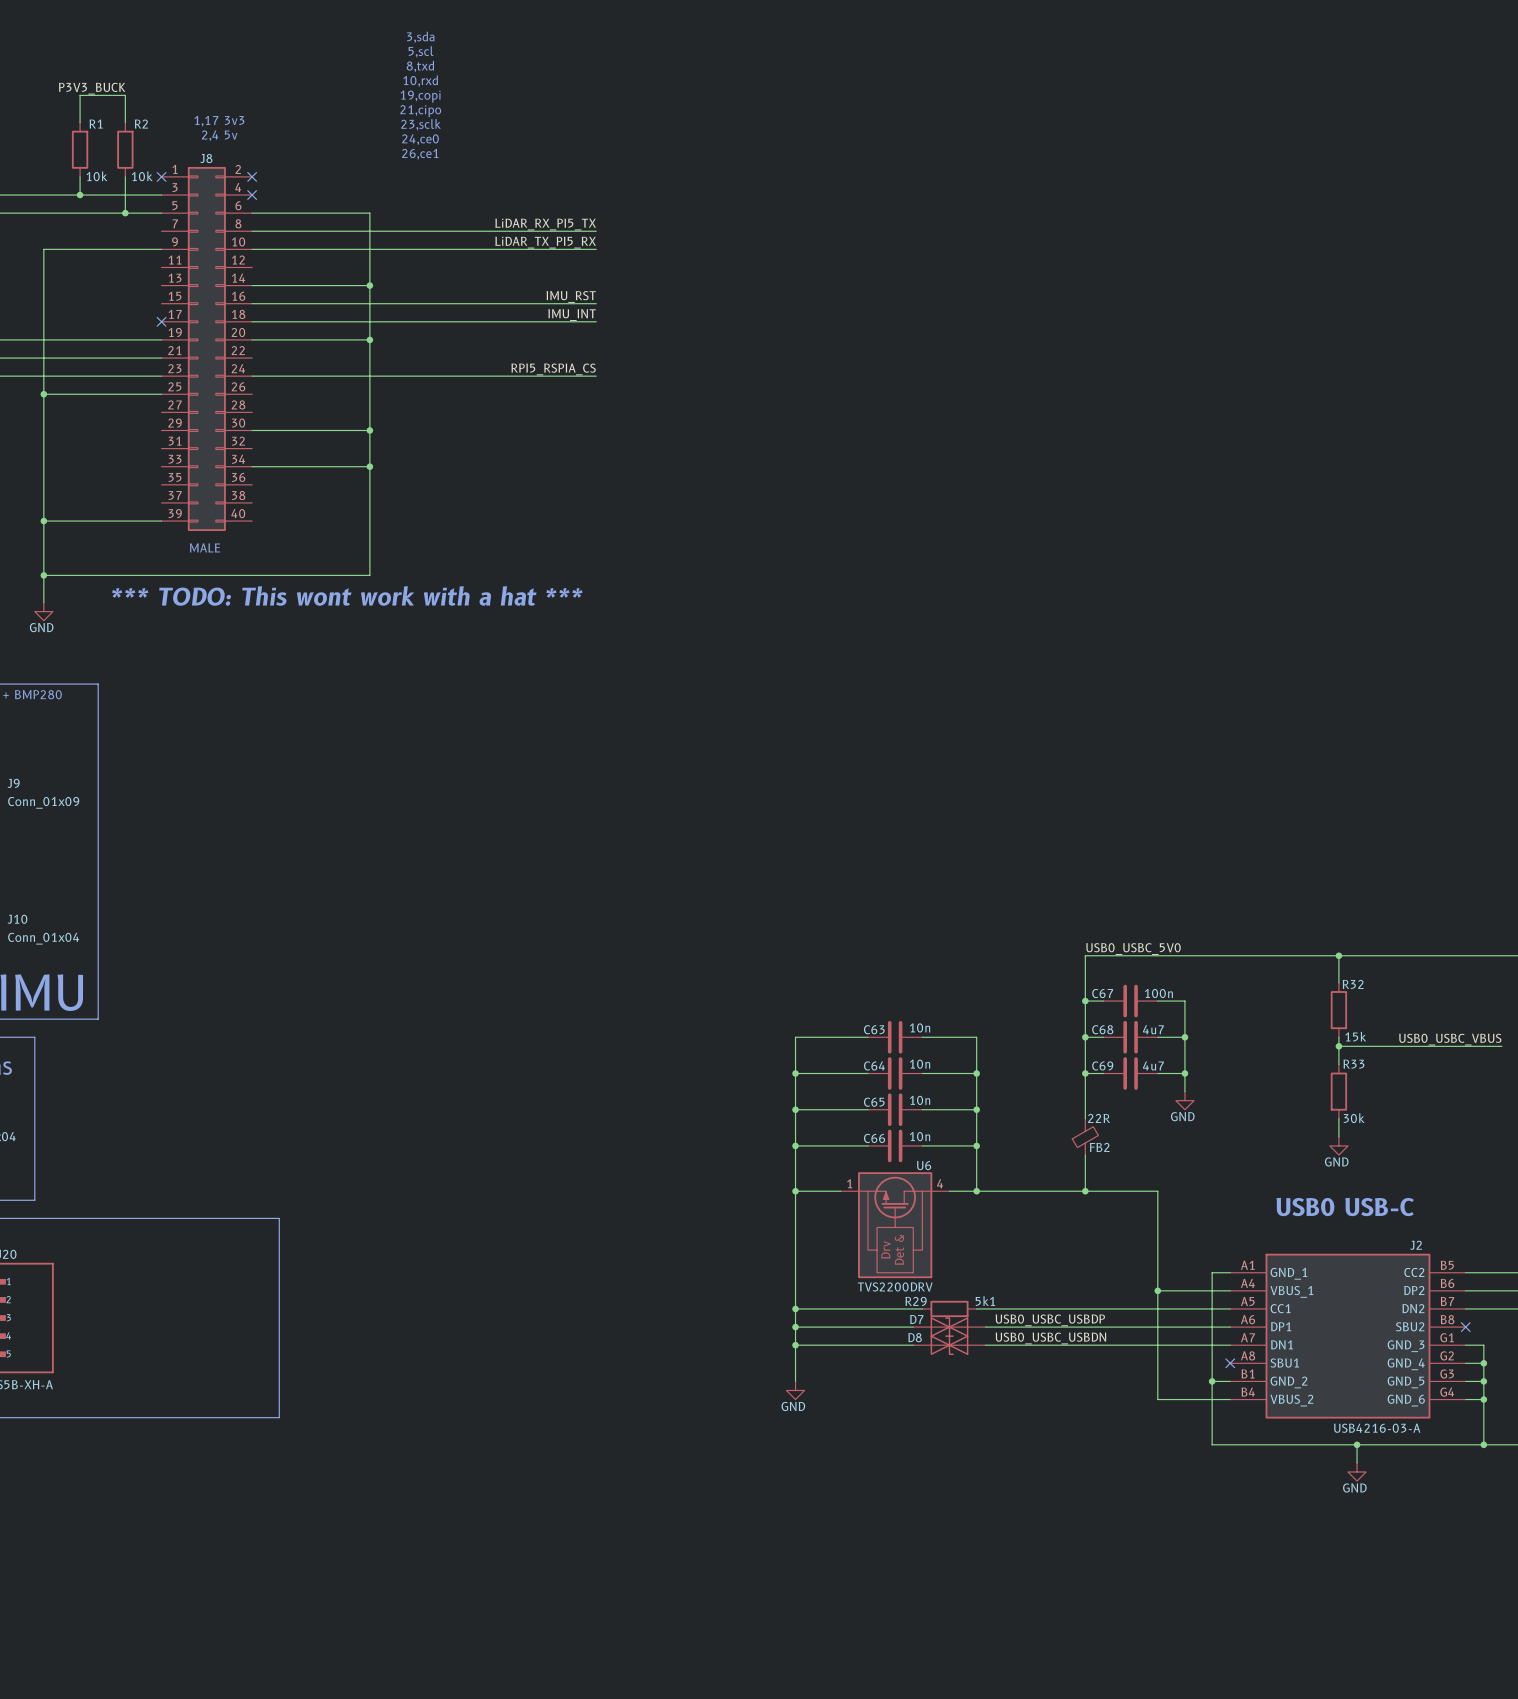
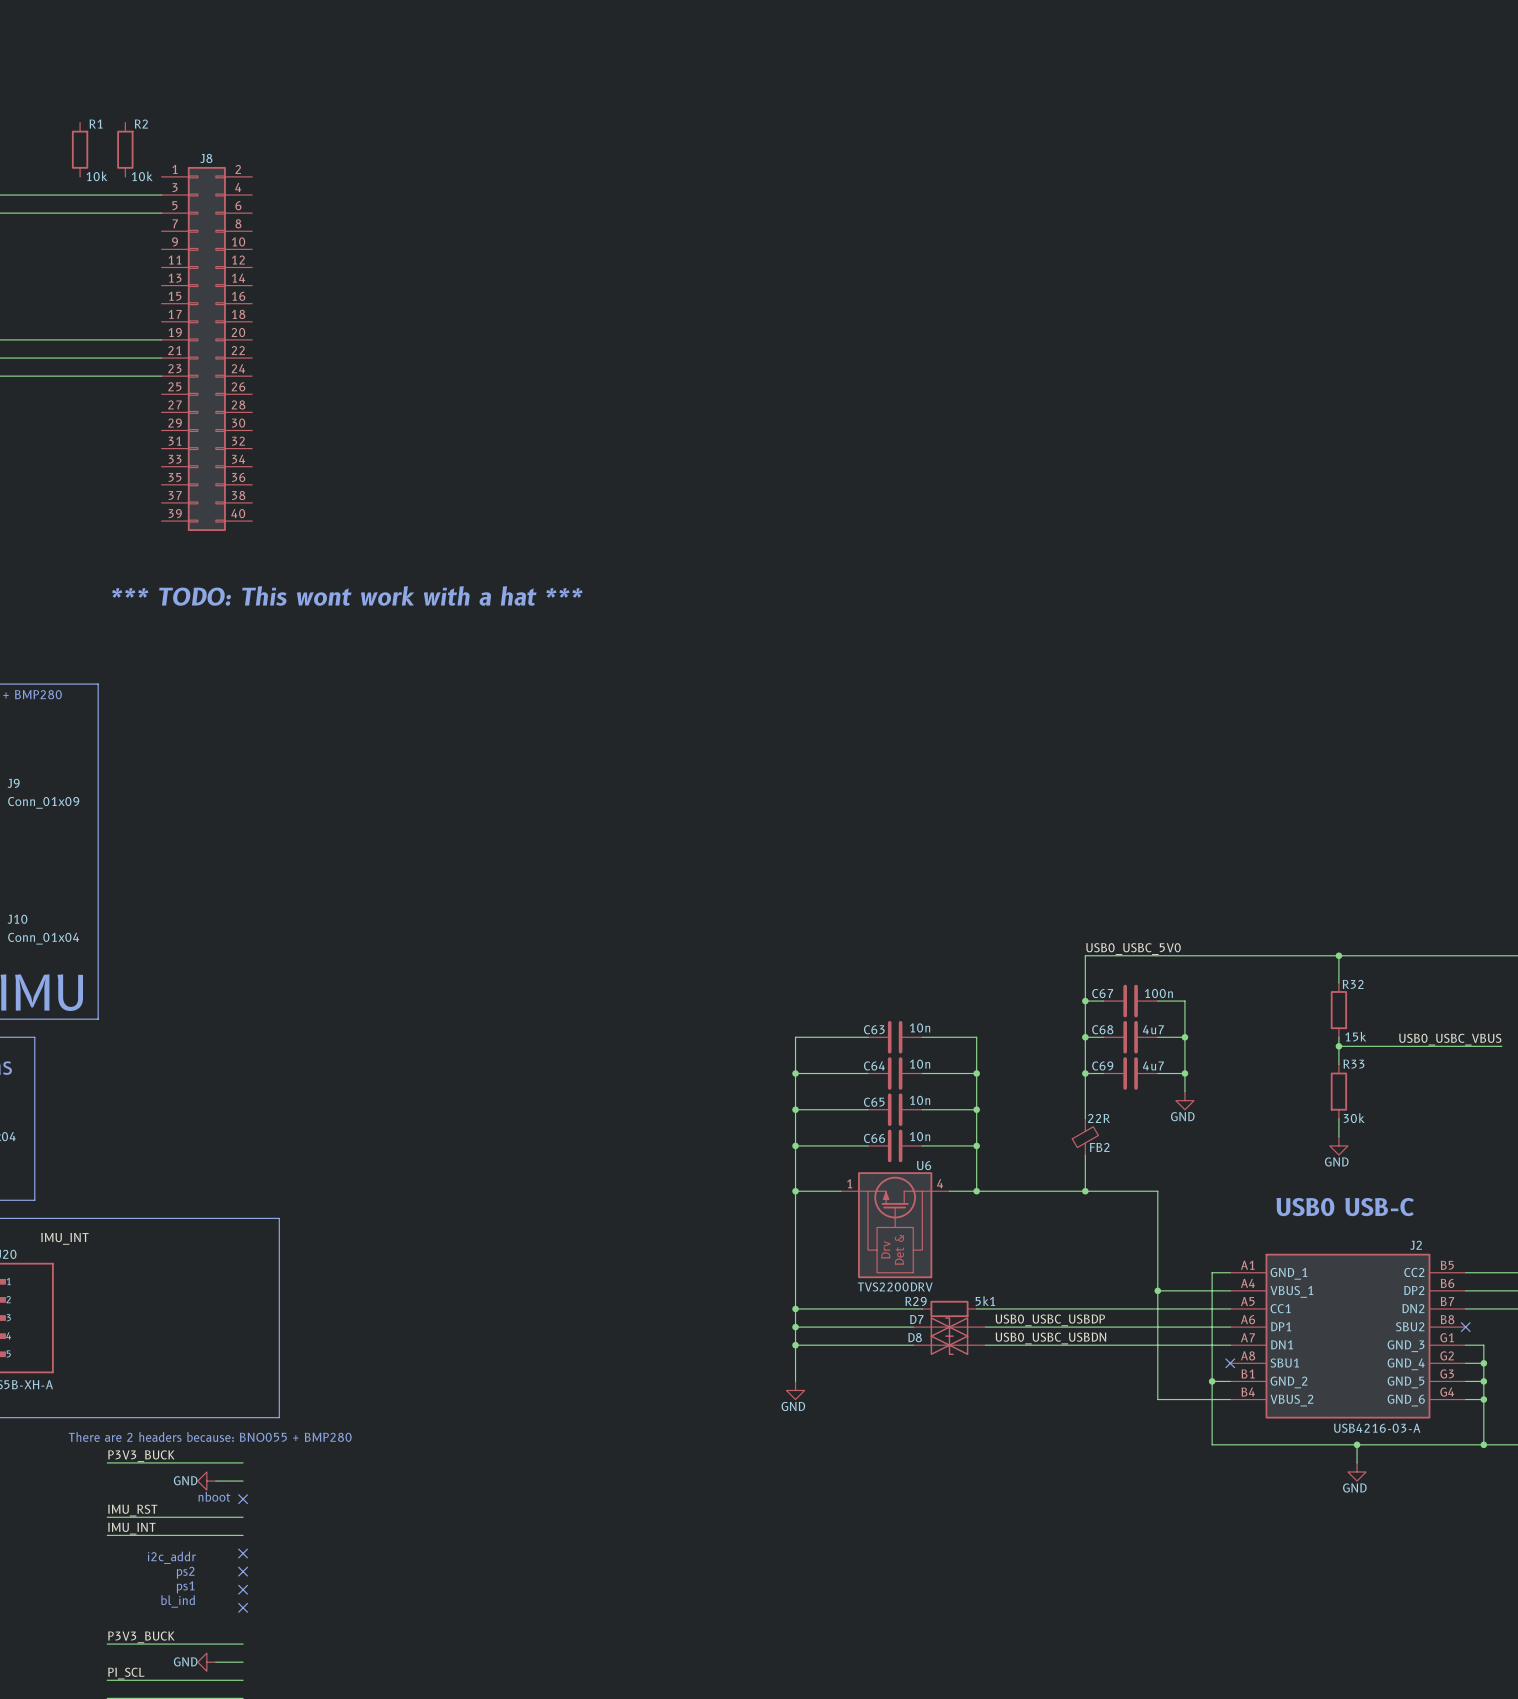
text: 3,sda (420, 37) -> none
text: 5,scl (421, 51) -> none
text: 8,txd (420, 66) -> none
text: 10,rxd (420, 81) -> none
label: P3V3_BUCK (92, 88) -> none
text: 19,copi (420, 96) -> none
text: 21,cipo (420, 111) -> none
text: 1,17 3v3 (219, 121) -> none
wire: (80, 122) (80, 95) (125, 95) (125, 122) -> none
text: 23,sclk (421, 124) -> none
text: 2,4 5v (219, 135) -> none
text: 24,ce0 (420, 139) -> none
text: 26,ce1 (420, 154) -> none
wire: (80, 176) (80, 195) -> none
wire: (125, 176) (125, 213) -> none
no-connect mark: (161, 176) -> none
no-connect mark: (252, 176) -> none
junction: (80, 195) -> none
no-connect mark: (252, 195) -> none
junction: (125, 213) -> none
wire: (252, 213) (369, 213) (369, 575) (43, 575) -> none
label: LiDAR_RX_PI5_TX (545, 224) -> none
wire: (252, 231) (596, 231) -> none
label: LiDAR_TX_PI5_RX (545, 242) -> none
wire: (161, 249) (43, 249) (43, 602) -> none
wire: (252, 249) (596, 249) -> none
wire: (252, 285) (369, 285) -> none
junction: (369, 285) -> none
label: IMU_RST (571, 296) -> none
wire: (252, 303) (596, 303) -> none
label: IMU_INT (572, 315) -> none
no-connect mark: (161, 321) -> none
wire: (252, 321) (596, 321) -> none
wire: (252, 339) (369, 339) -> none
junction: (369, 339) -> none
label: RPI5_RSPIA_CS (553, 369) -> none
wire: (252, 376) (596, 376) -> none
wire: (43, 394) (161, 394) -> none
junction: (43, 394) -> none
wire: (252, 430) (369, 430) -> none
junction: (369, 430) -> none
wire: (252, 466) (369, 466) -> none
junction: (369, 466) -> none
wire: (43, 521) (161, 521) -> none
junction: (43, 521) -> none
text: MALE (205, 547) -> none
junction: (43, 575) -> none
power symbol: GND (43, 611) -> none
label: none -> IMU_INT (64, 1238)
text: none -> There are 2 headers because: BNO055 + BMP280 (210, 1437)
label: none -> P3V3_BUCK (141, 1456)
wire: none -> (107, 1462) (243, 1462)
power symbol: none -> GND (206, 1481)
wire: none -> (215, 1481) (243, 1481)
text: none -> nboot (214, 1496)
no-connect mark: none -> (243, 1499)
label: none -> IMU_RST (132, 1510)
wire: none -> (107, 1517) (243, 1517)
label: none -> IMU_INT (131, 1528)
wire: none -> (107, 1535) (243, 1535)
no-connect mark: none -> (243, 1553)
text: none -> i2c_addr (171, 1557)
no-connect mark: none -> (243, 1571)
text: none -> ps2 (185, 1572)
text: none -> ps1 (185, 1587)
no-connect mark: none -> (243, 1589)
text: none -> bl_ind (178, 1601)
no-connect mark: none -> (243, 1607)
label: none -> P3V3_BUCK (141, 1637)
wire: none -> (107, 1644) (243, 1644)
power symbol: none -> GND (206, 1662)
wire: none -> (215, 1662) (243, 1662)
label: none -> PI_SCL (126, 1673)
wire: none -> (107, 1680) (243, 1680)
wire: none -> (107, 1698) (243, 1698)

